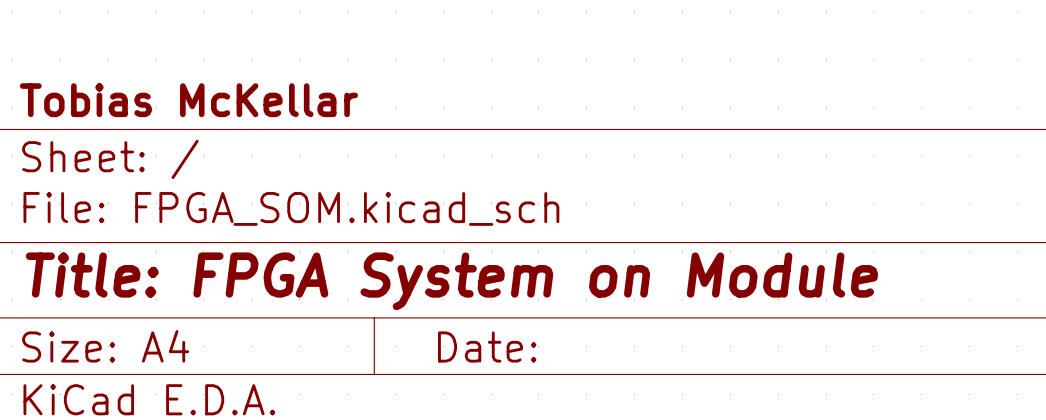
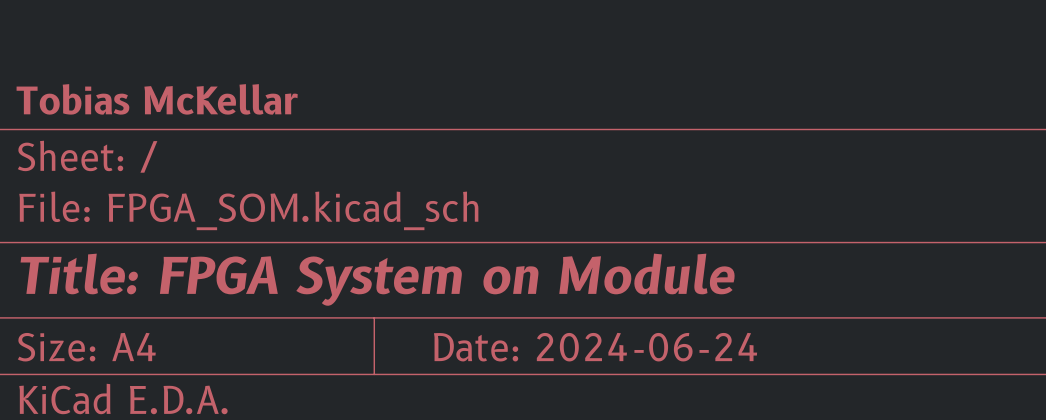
title block: Date: (487, 347) -> Date: 2024-06-24 (595, 347)

